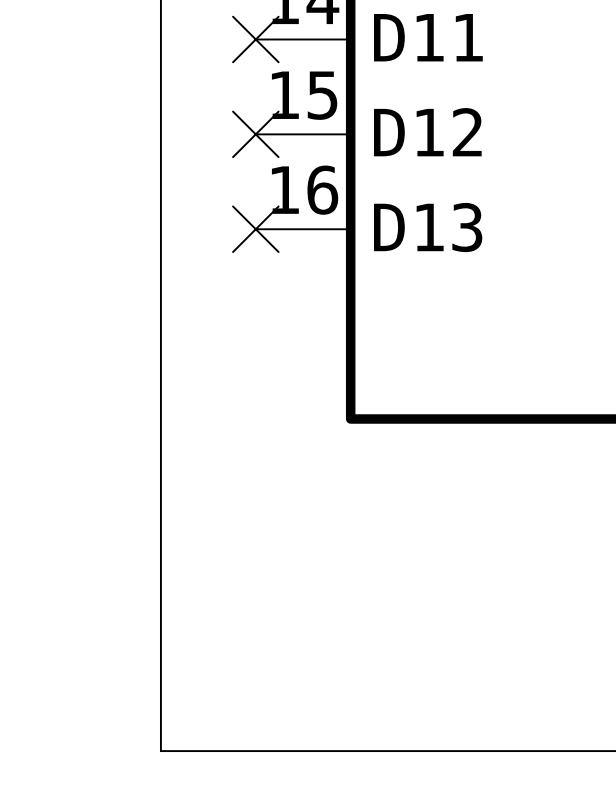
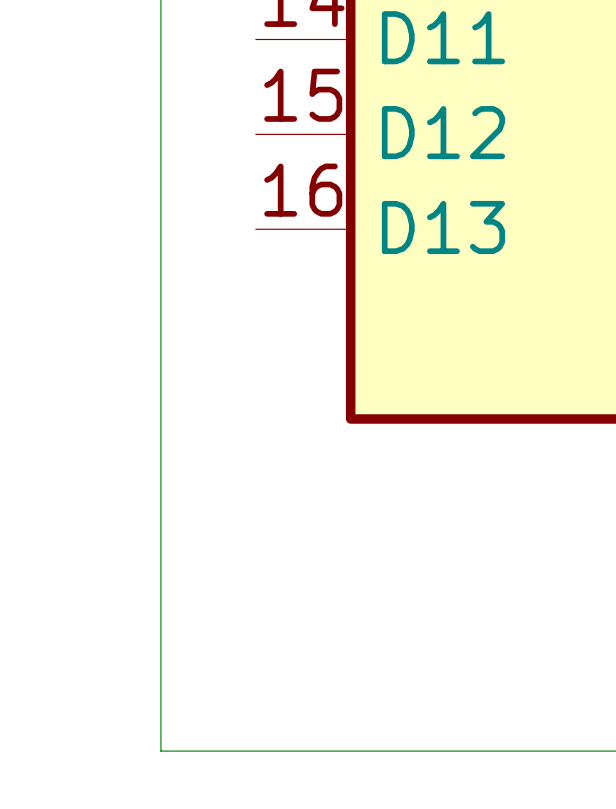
no-connect mark: (255, 39) -> none
no-connect mark: (255, 134) -> none
no-connect mark: (255, 229) -> none

